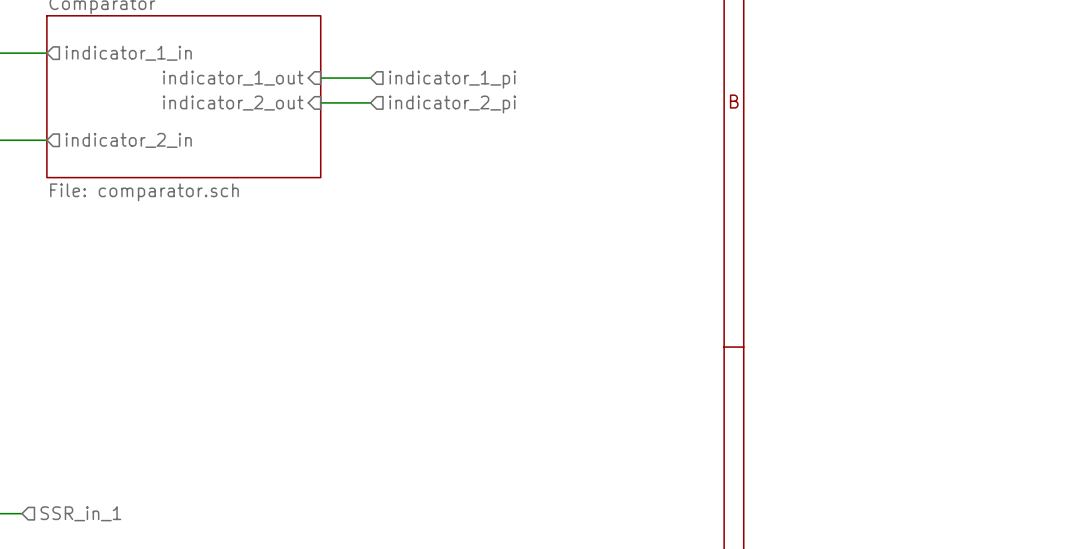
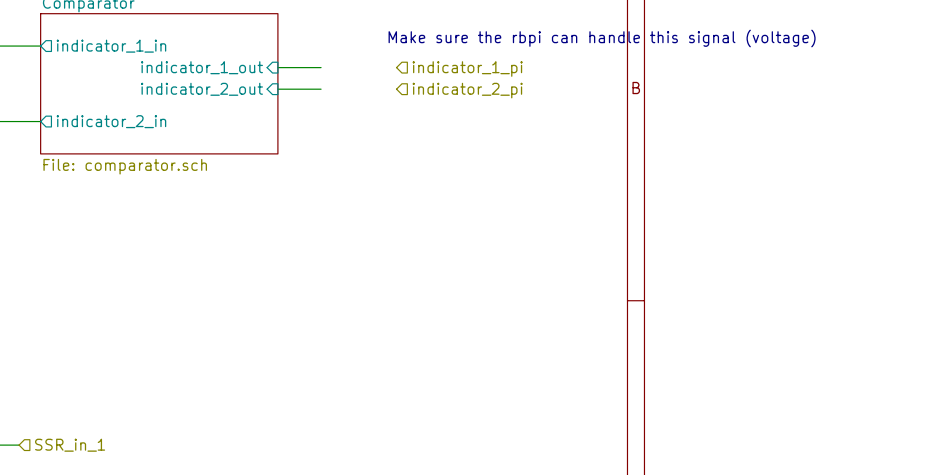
text: none -> Make sure the rbpi can handle this signal (voltage) (602, 38)
hierarchical label position: indicator_1_pi (452, 79) -> indicator_1_pi (467, 69)
hierarchical label position: indicator_2_pi (452, 104) -> indicator_2_pi (467, 90)

